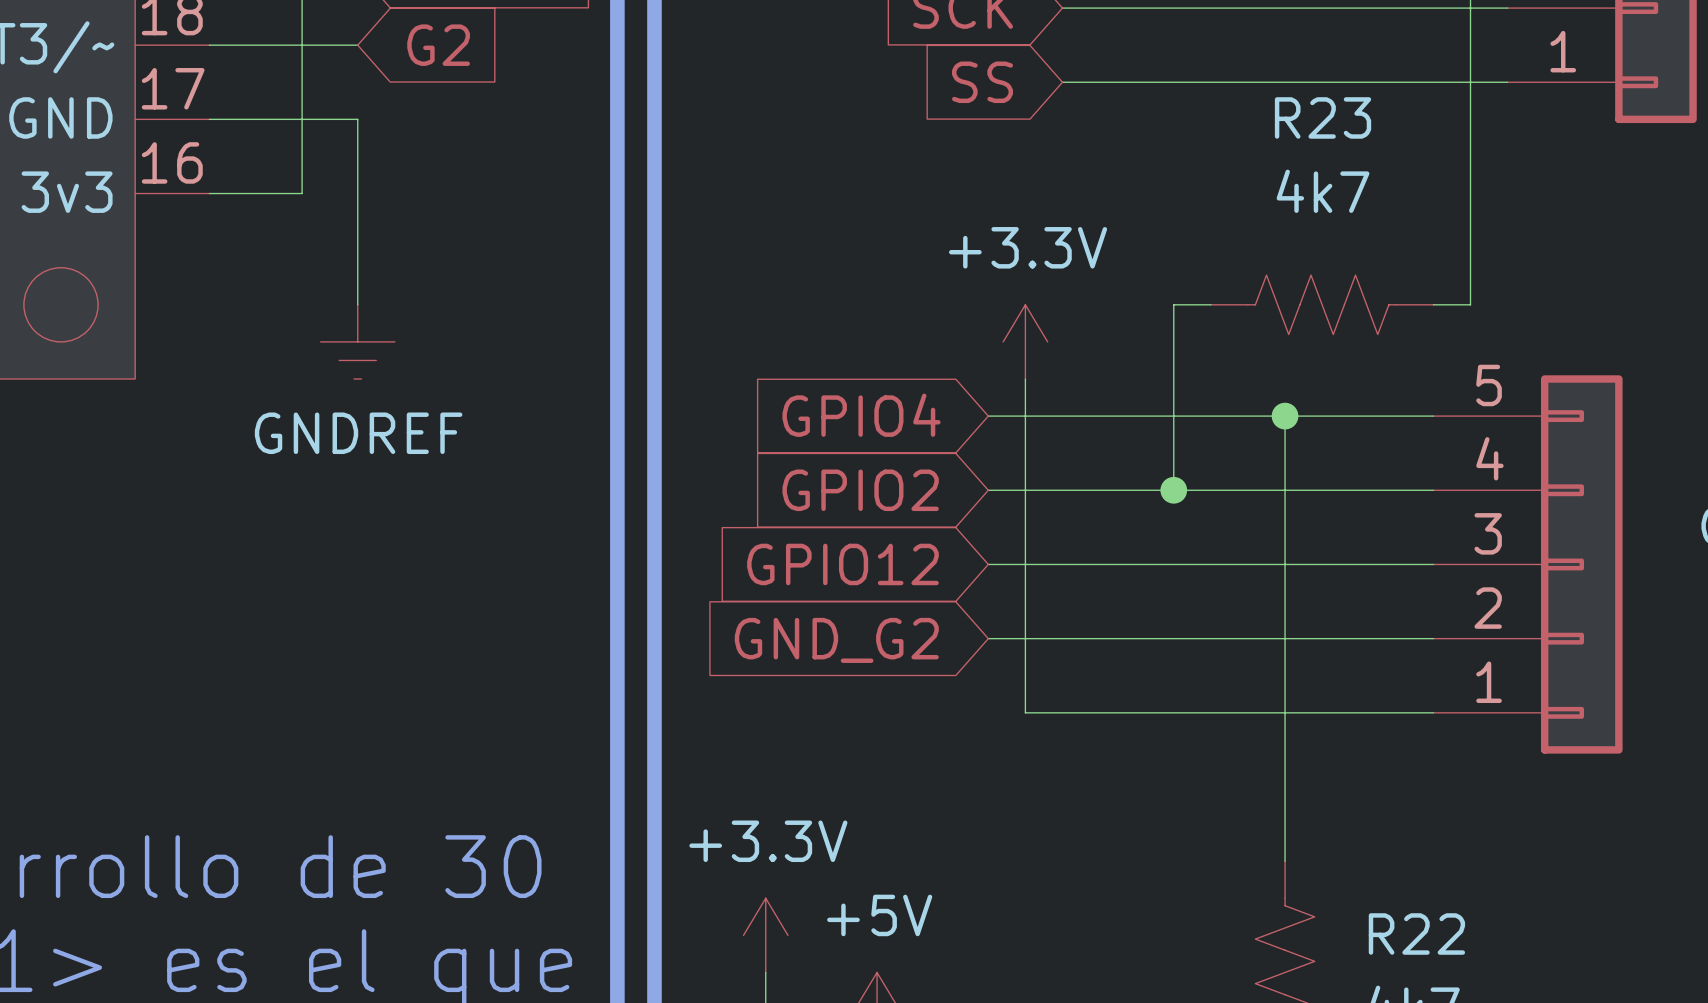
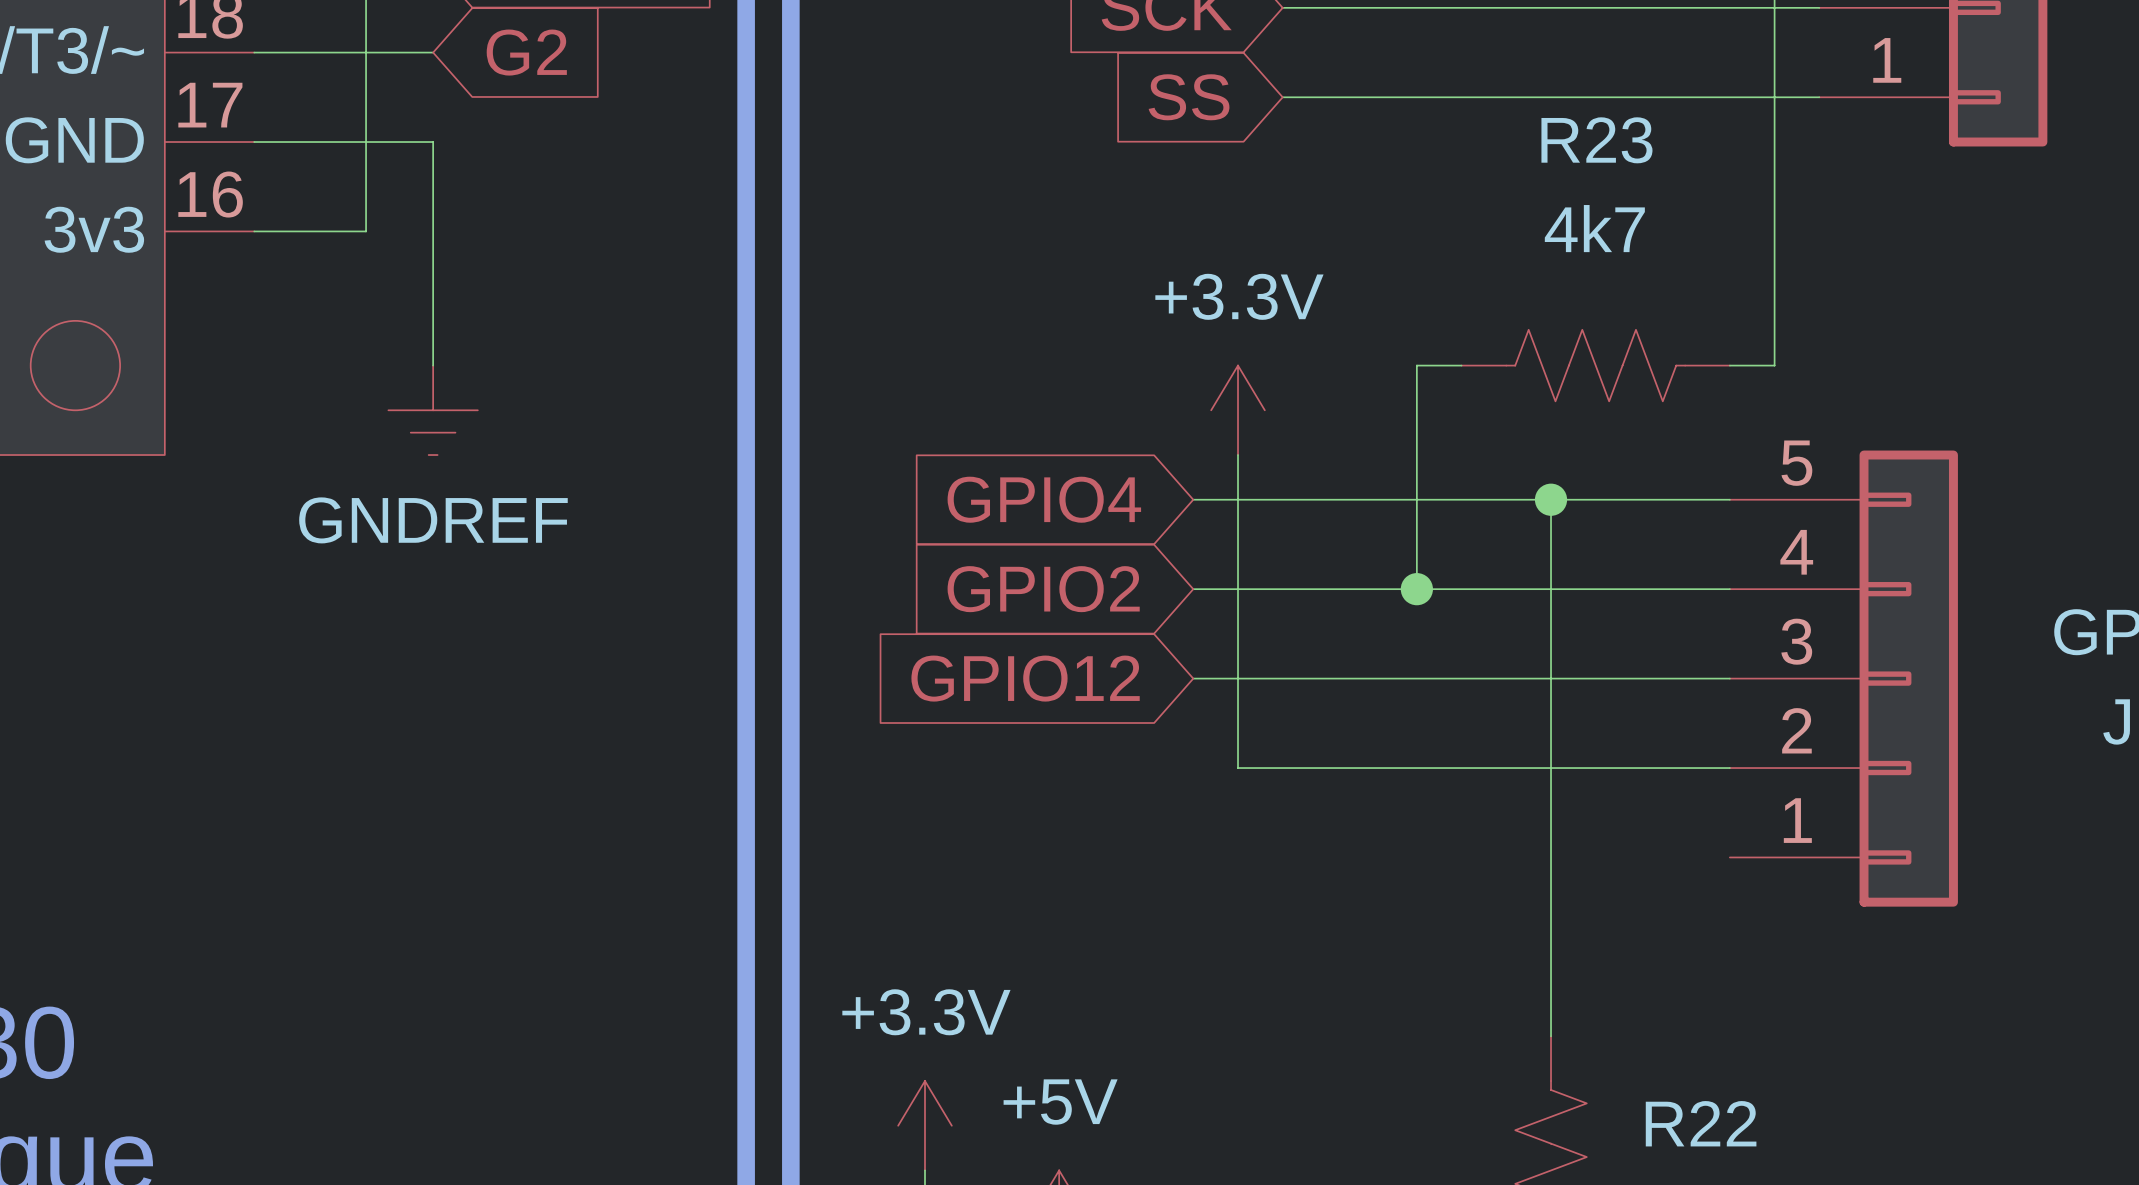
wire: (988, 638) (1025, 638) (1025, 712) (1433, 712) -> none
global label: GND_G2 (836, 640) -> none

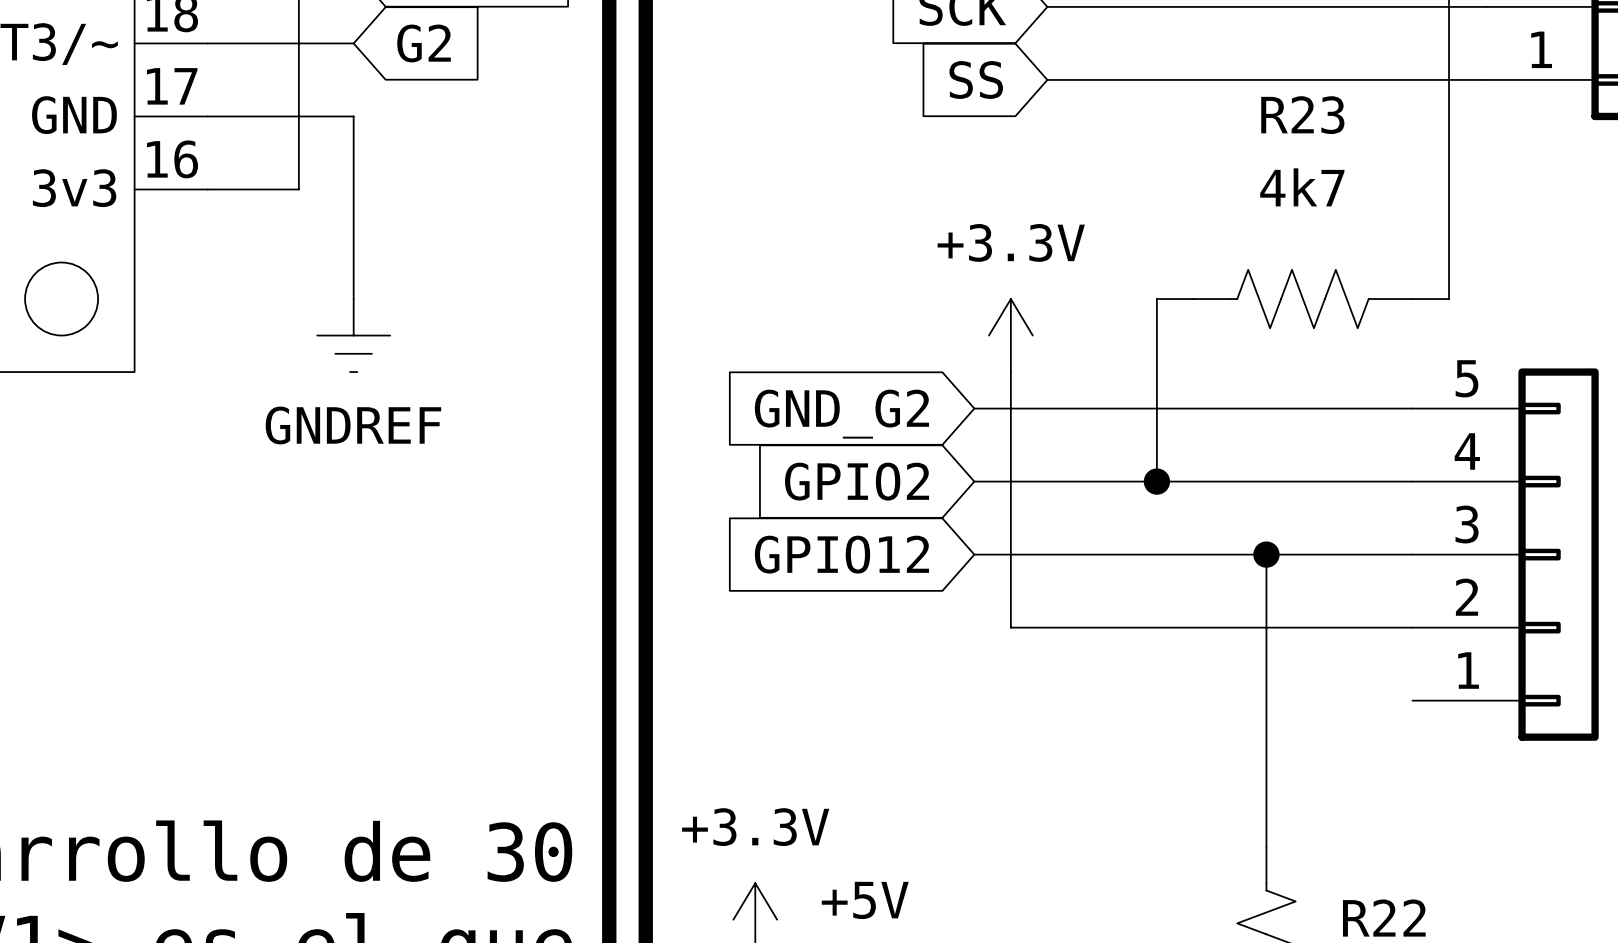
global label: GPIO4 (1044, 499) -> GND_G2 (841, 414)
wire: (1551, 499) (1551, 678) -> none
junction position: (1551, 499) -> (1266, 554)

